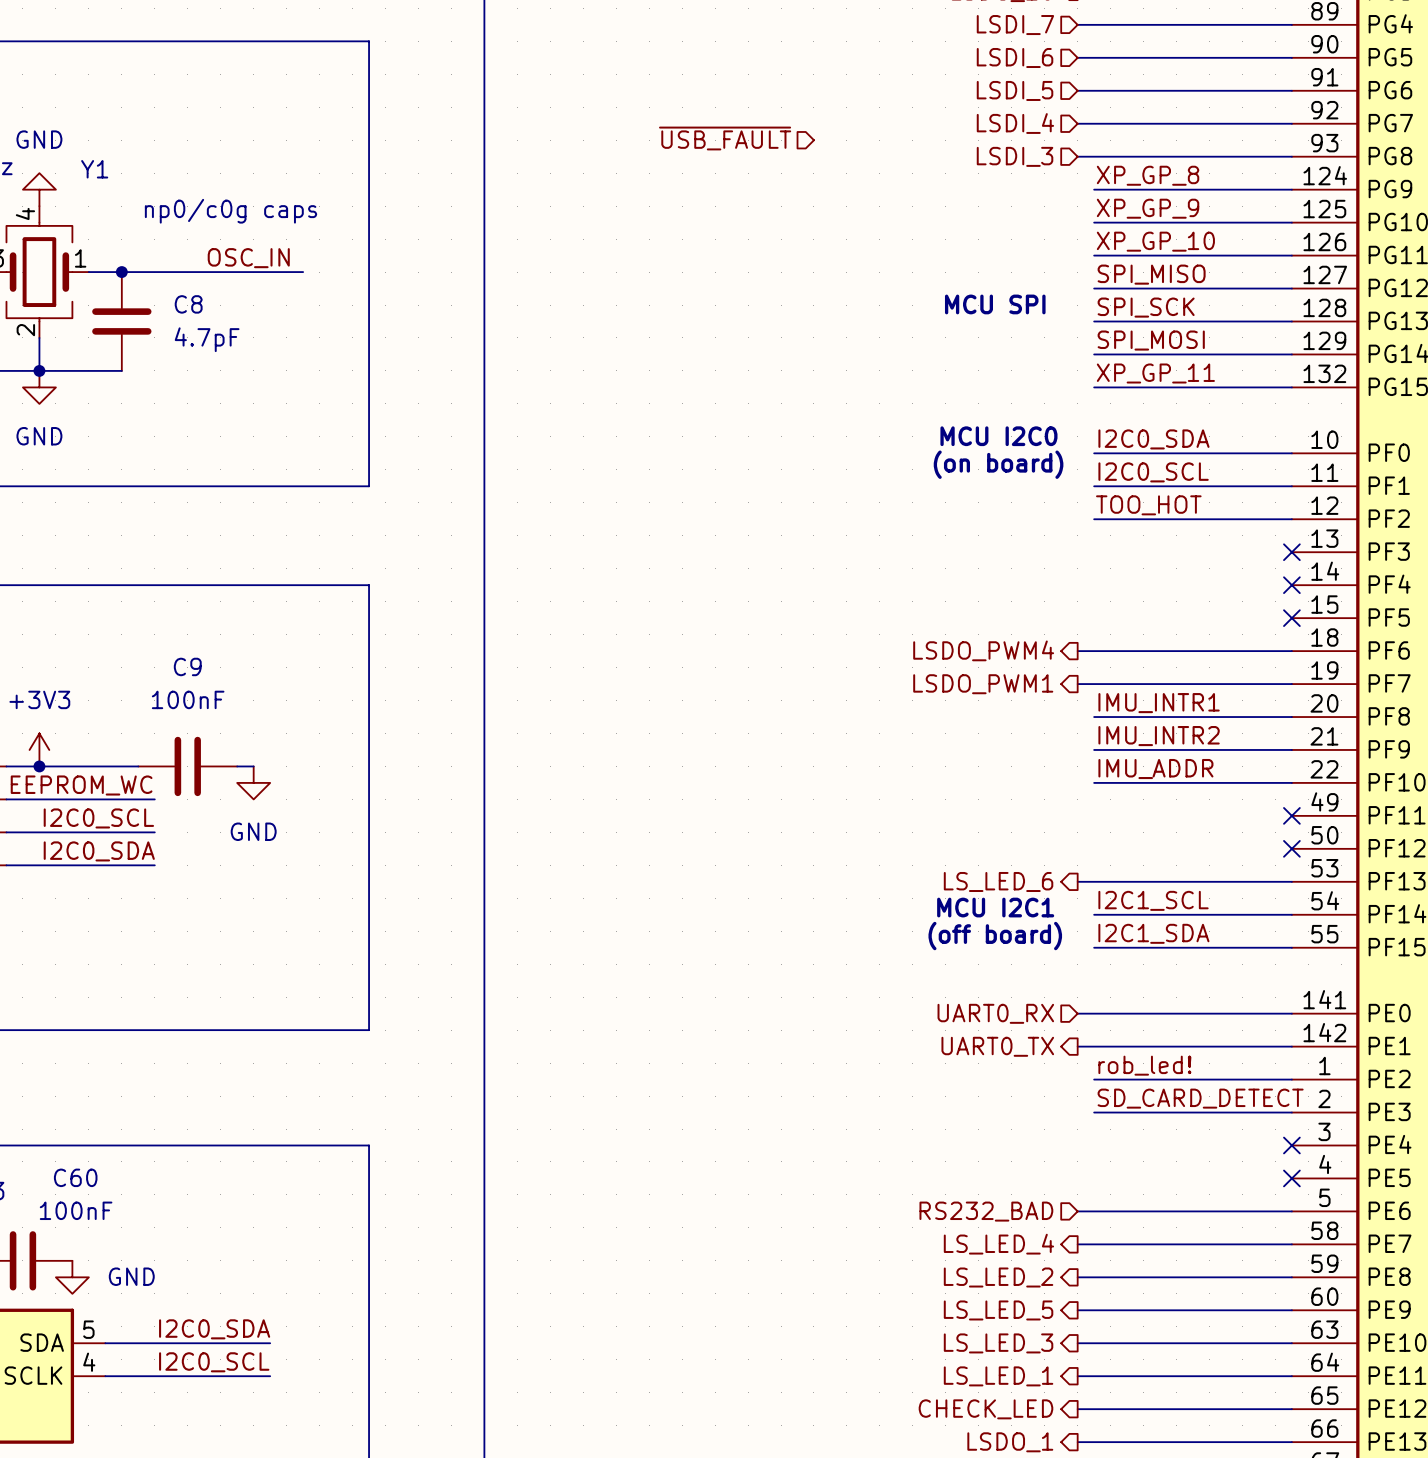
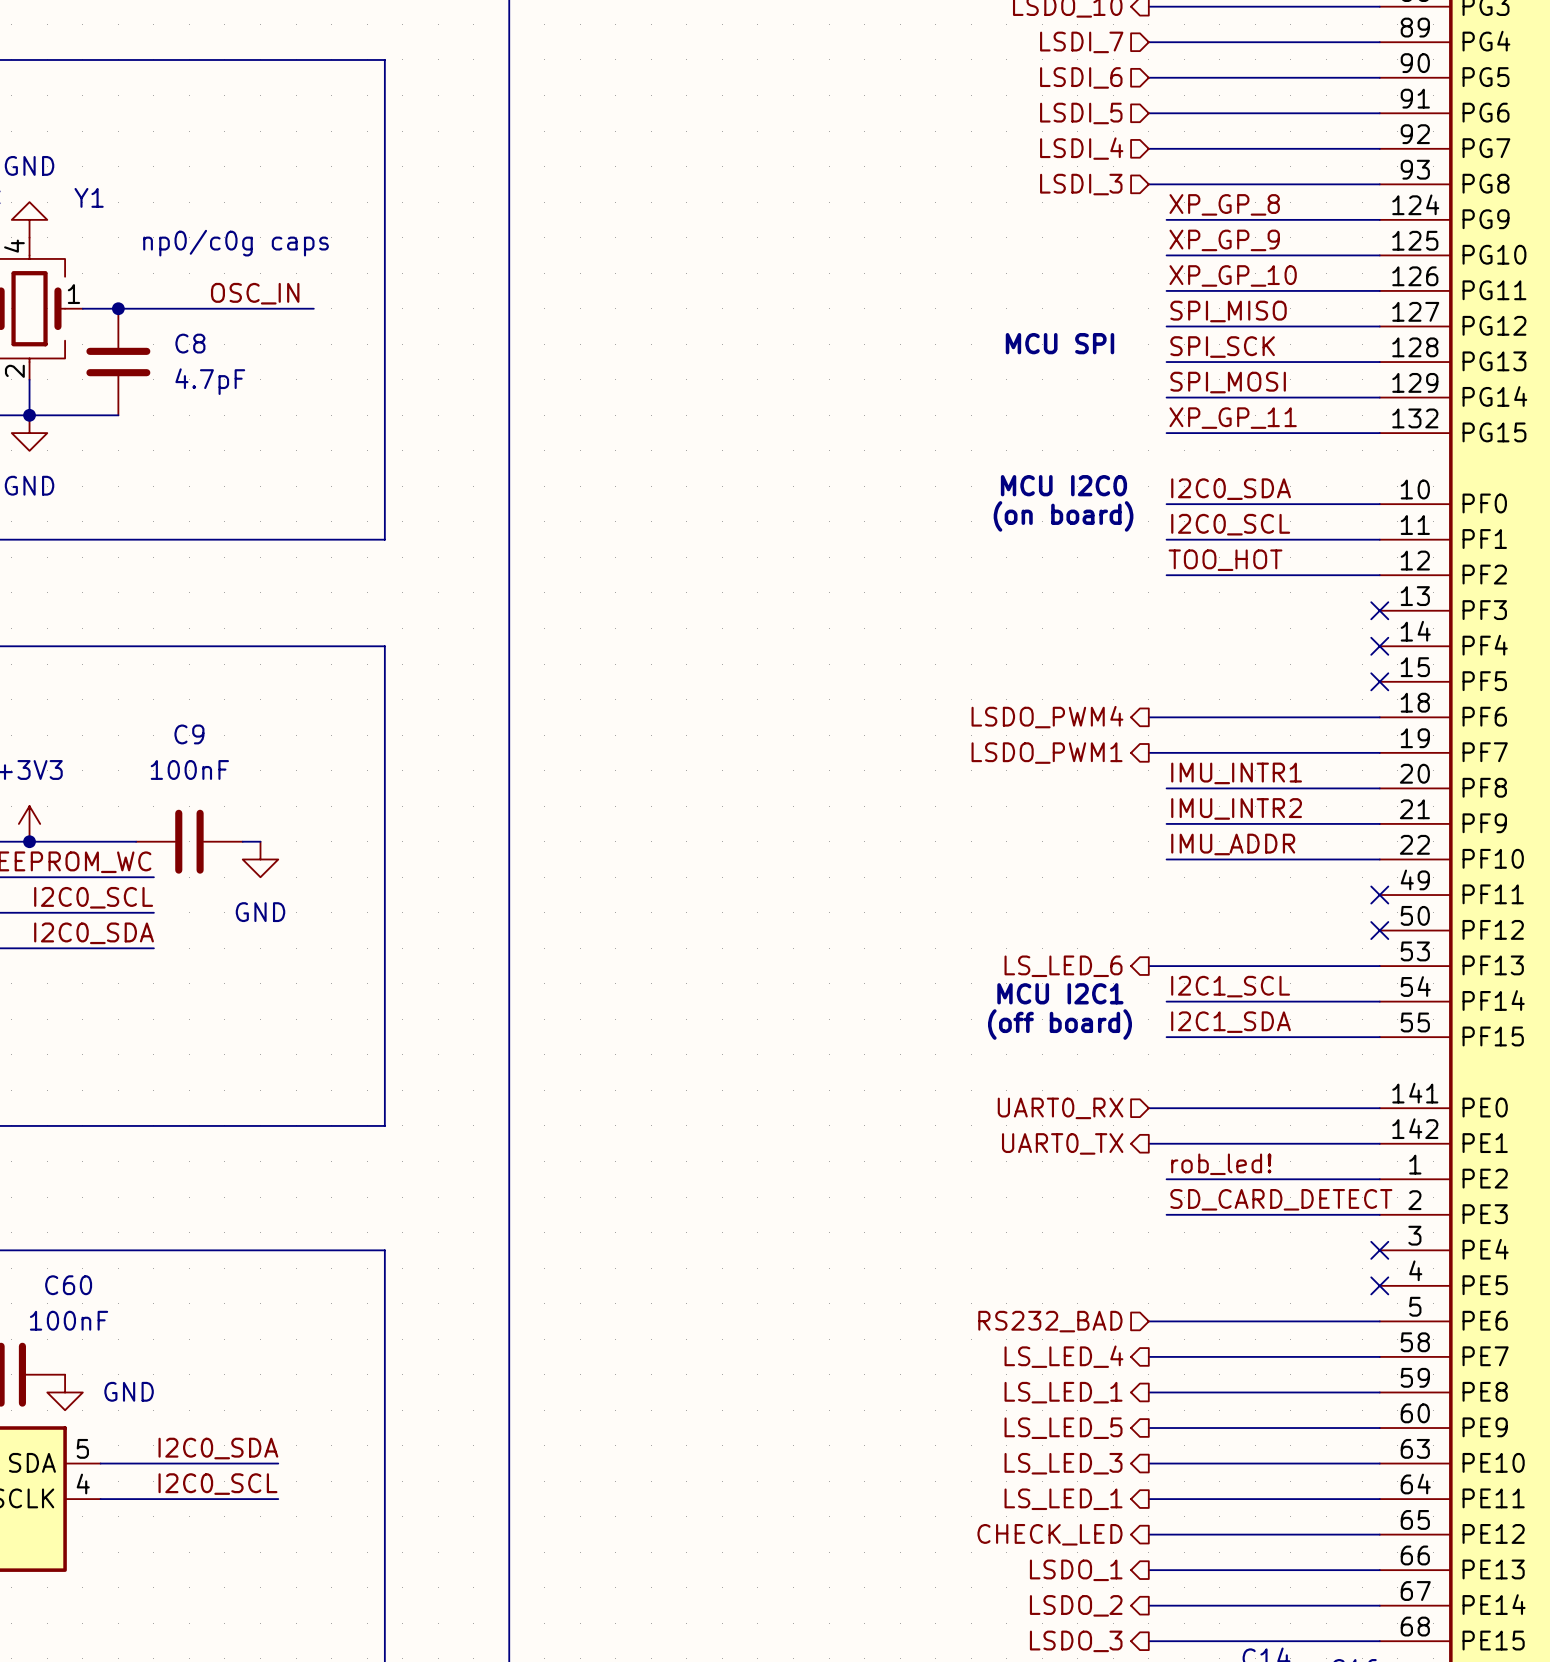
hierarchical label: ~{USB_FAULT} (725, 138) -> none
hierarchical label: LS_LED_2 (998, 1277) -> LS_LED_1 (1063, 1392)

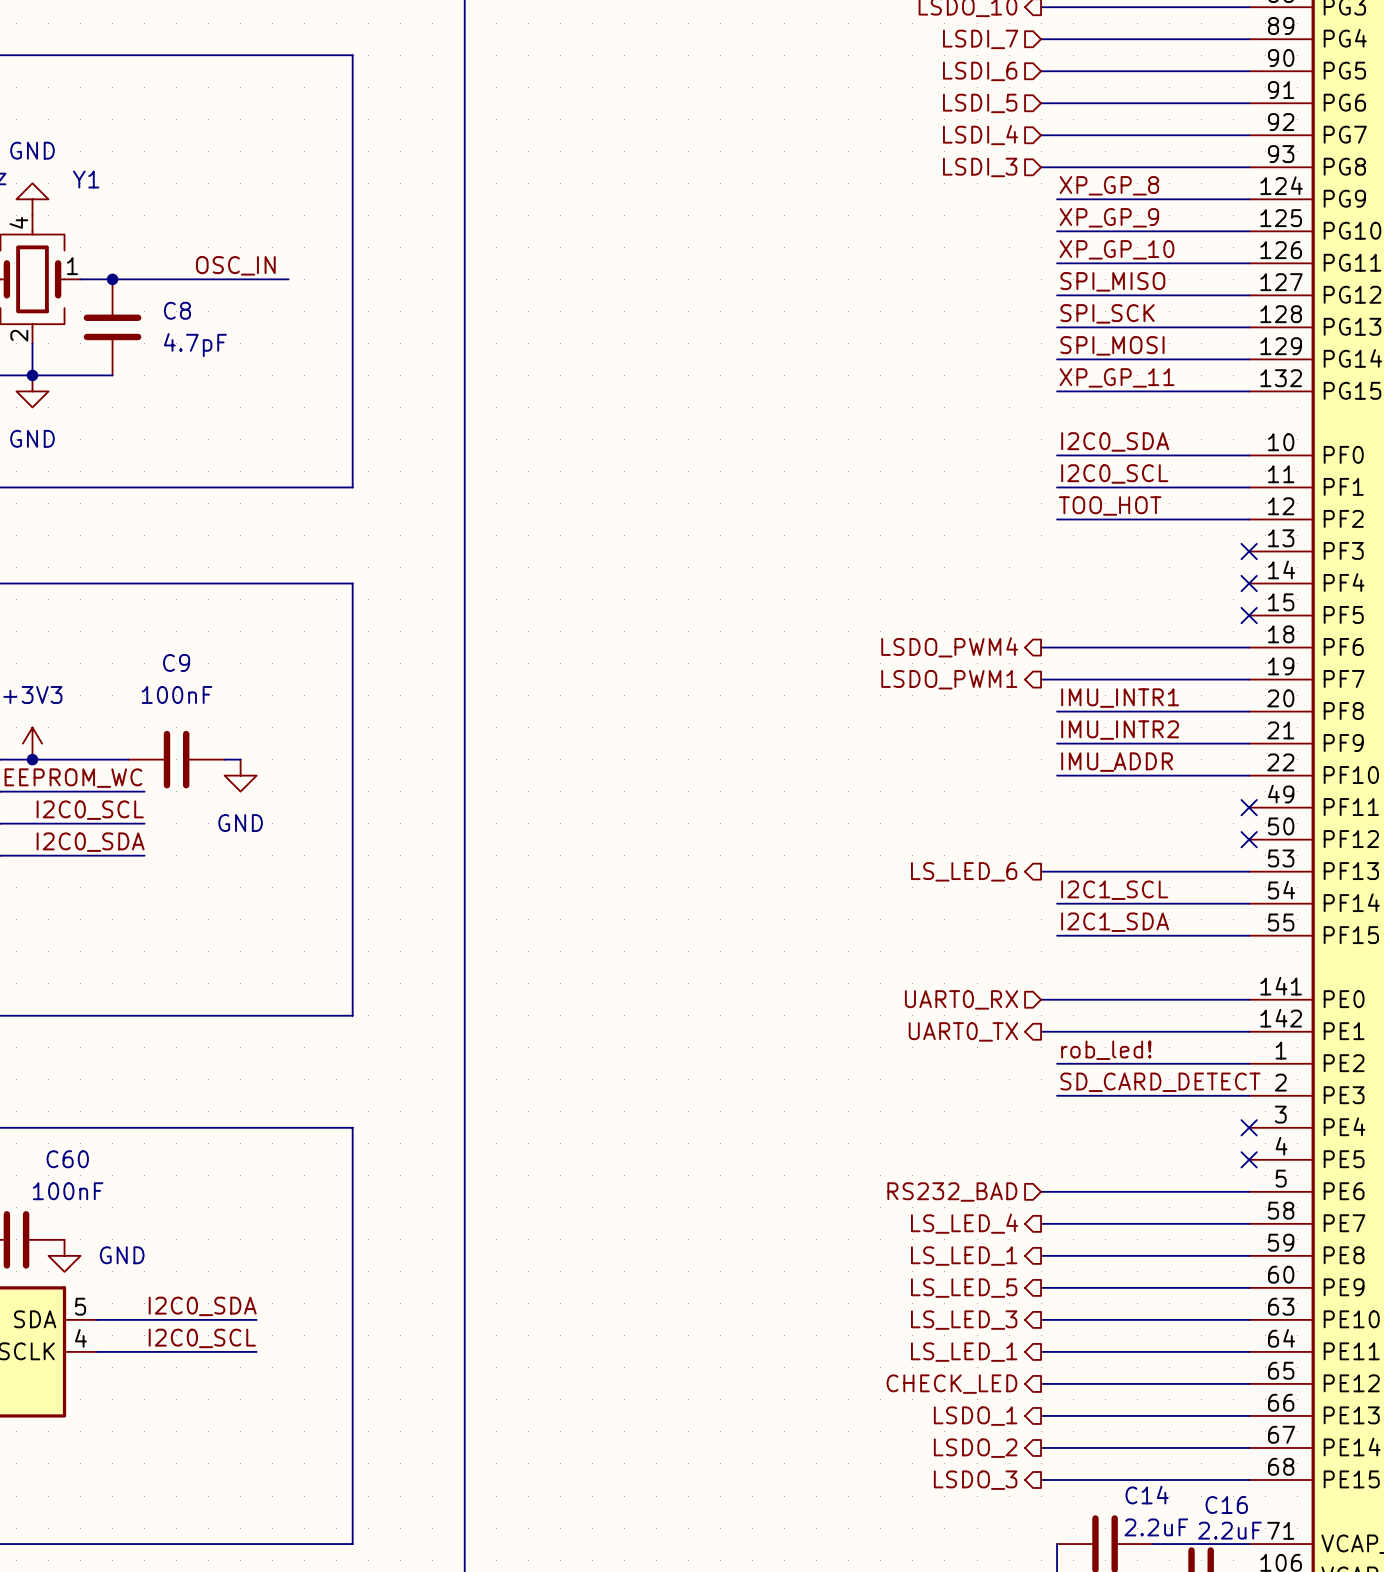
text: np0/c0g caps (236, 243) -> none
text: MCU SPI (1059, 343) -> none
text: MCU I2C0 (1063, 485) -> none
text: (on board) (1063, 516) -> none
text: MCU I2C1 (1060, 993) -> none
text: (off board) (1059, 1024) -> none

